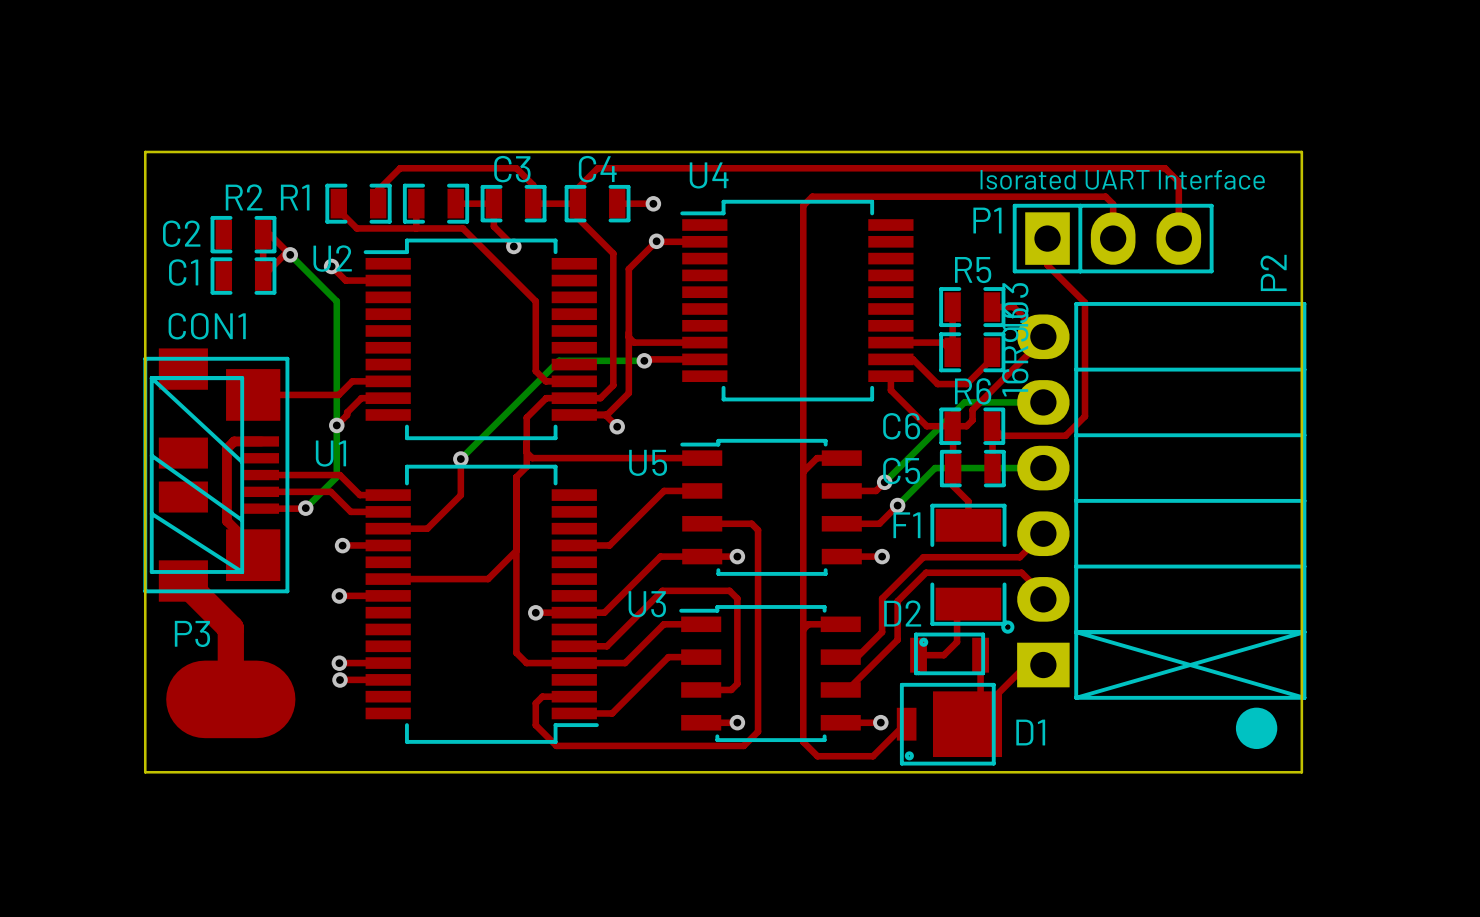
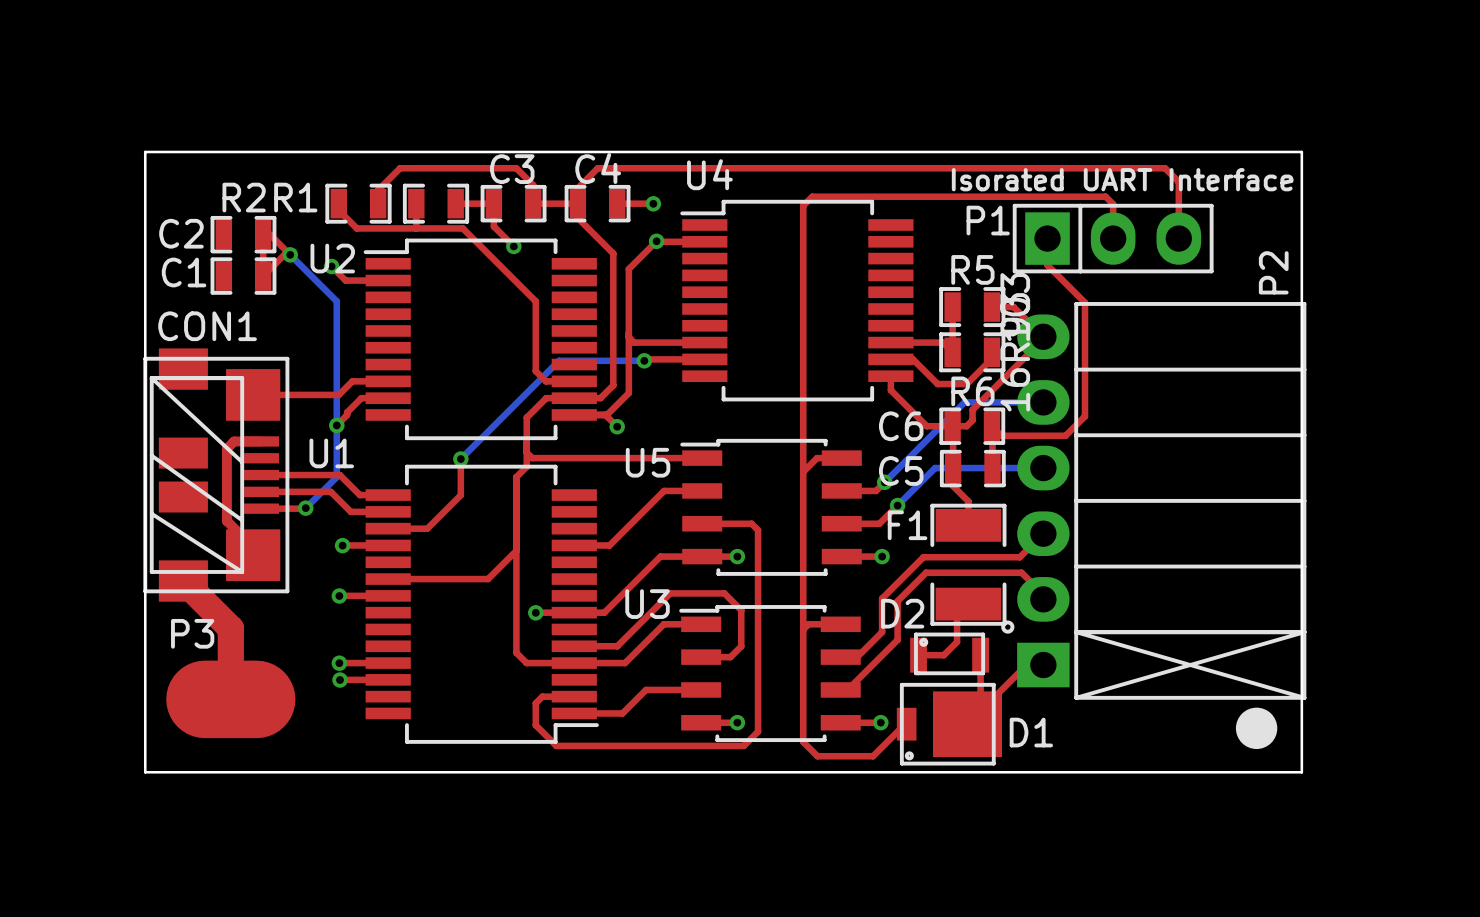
top track: (606, 646) (662, 590) (729, 590) (737, 598) (737, 683) (731, 689) (701, 689) -> (606, 646) (617, 646) (670, 593) (724, 593) (741, 610) (741, 646) (730, 657) (701, 657)
top track: (701, 657) (668, 657) (612, 713) -> (701, 689) (646, 689) (622, 713) (612, 713)

